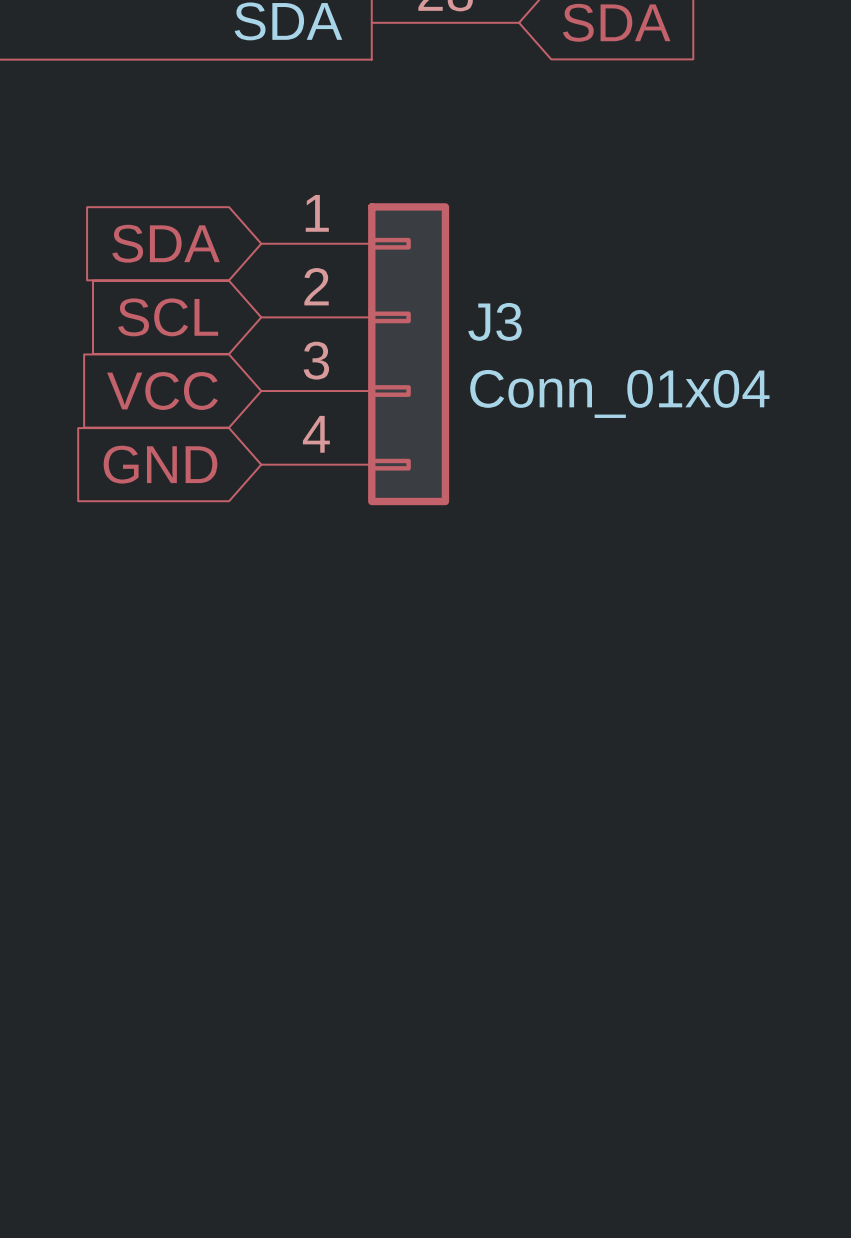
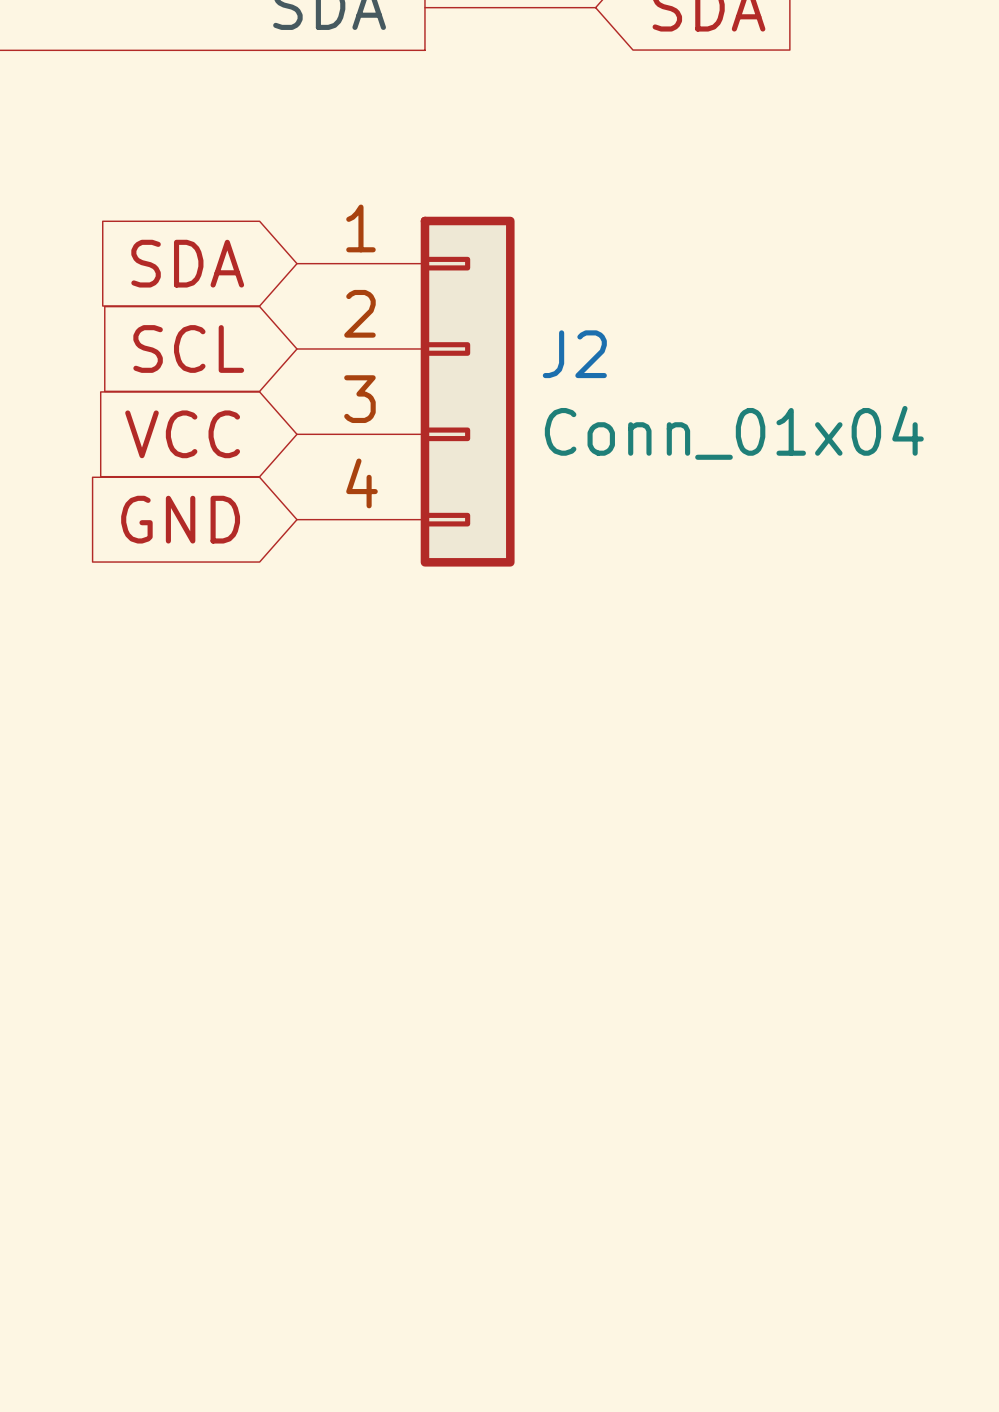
J3 name: J3 (495, 321) -> J2 (574, 354)

